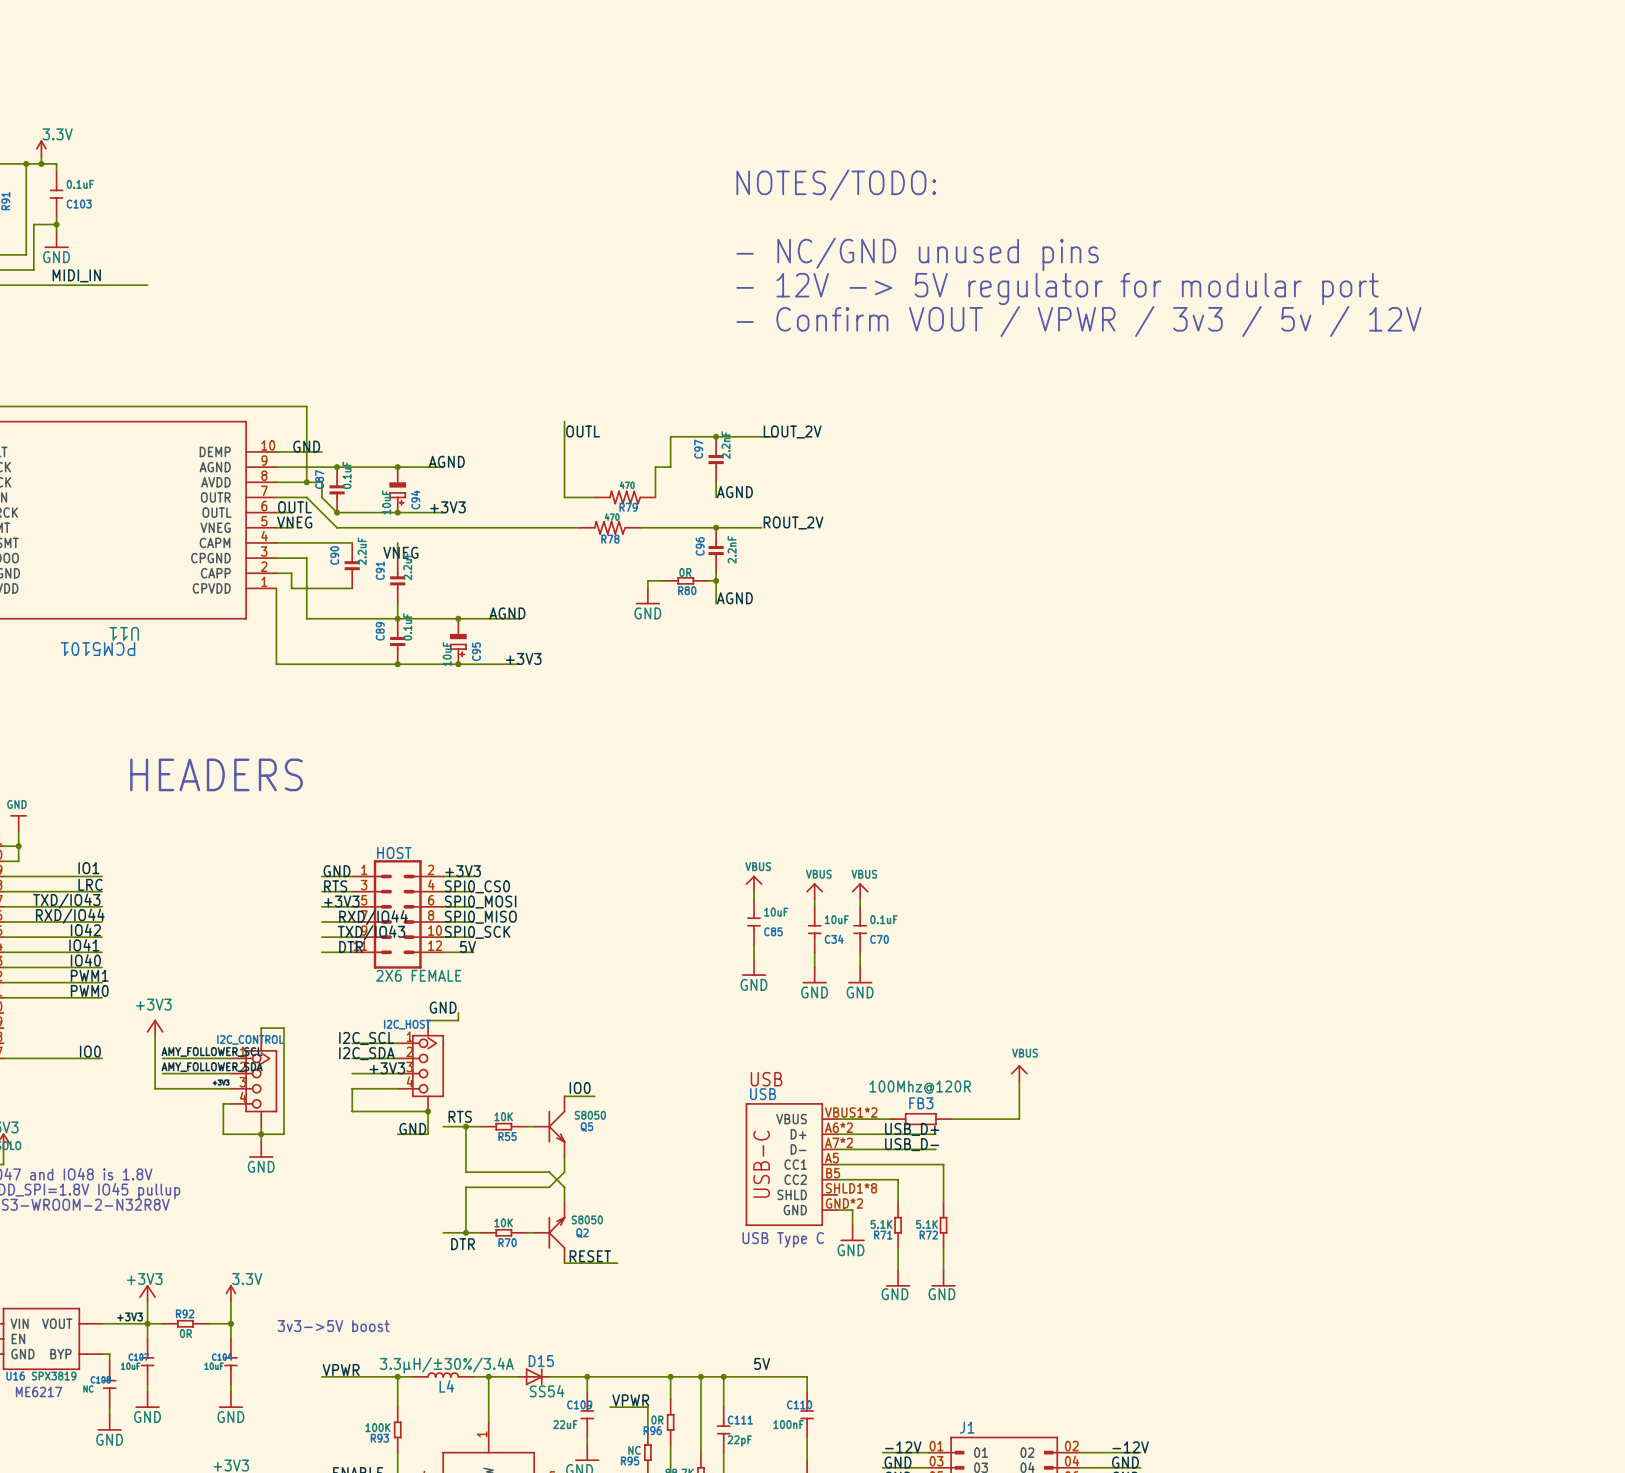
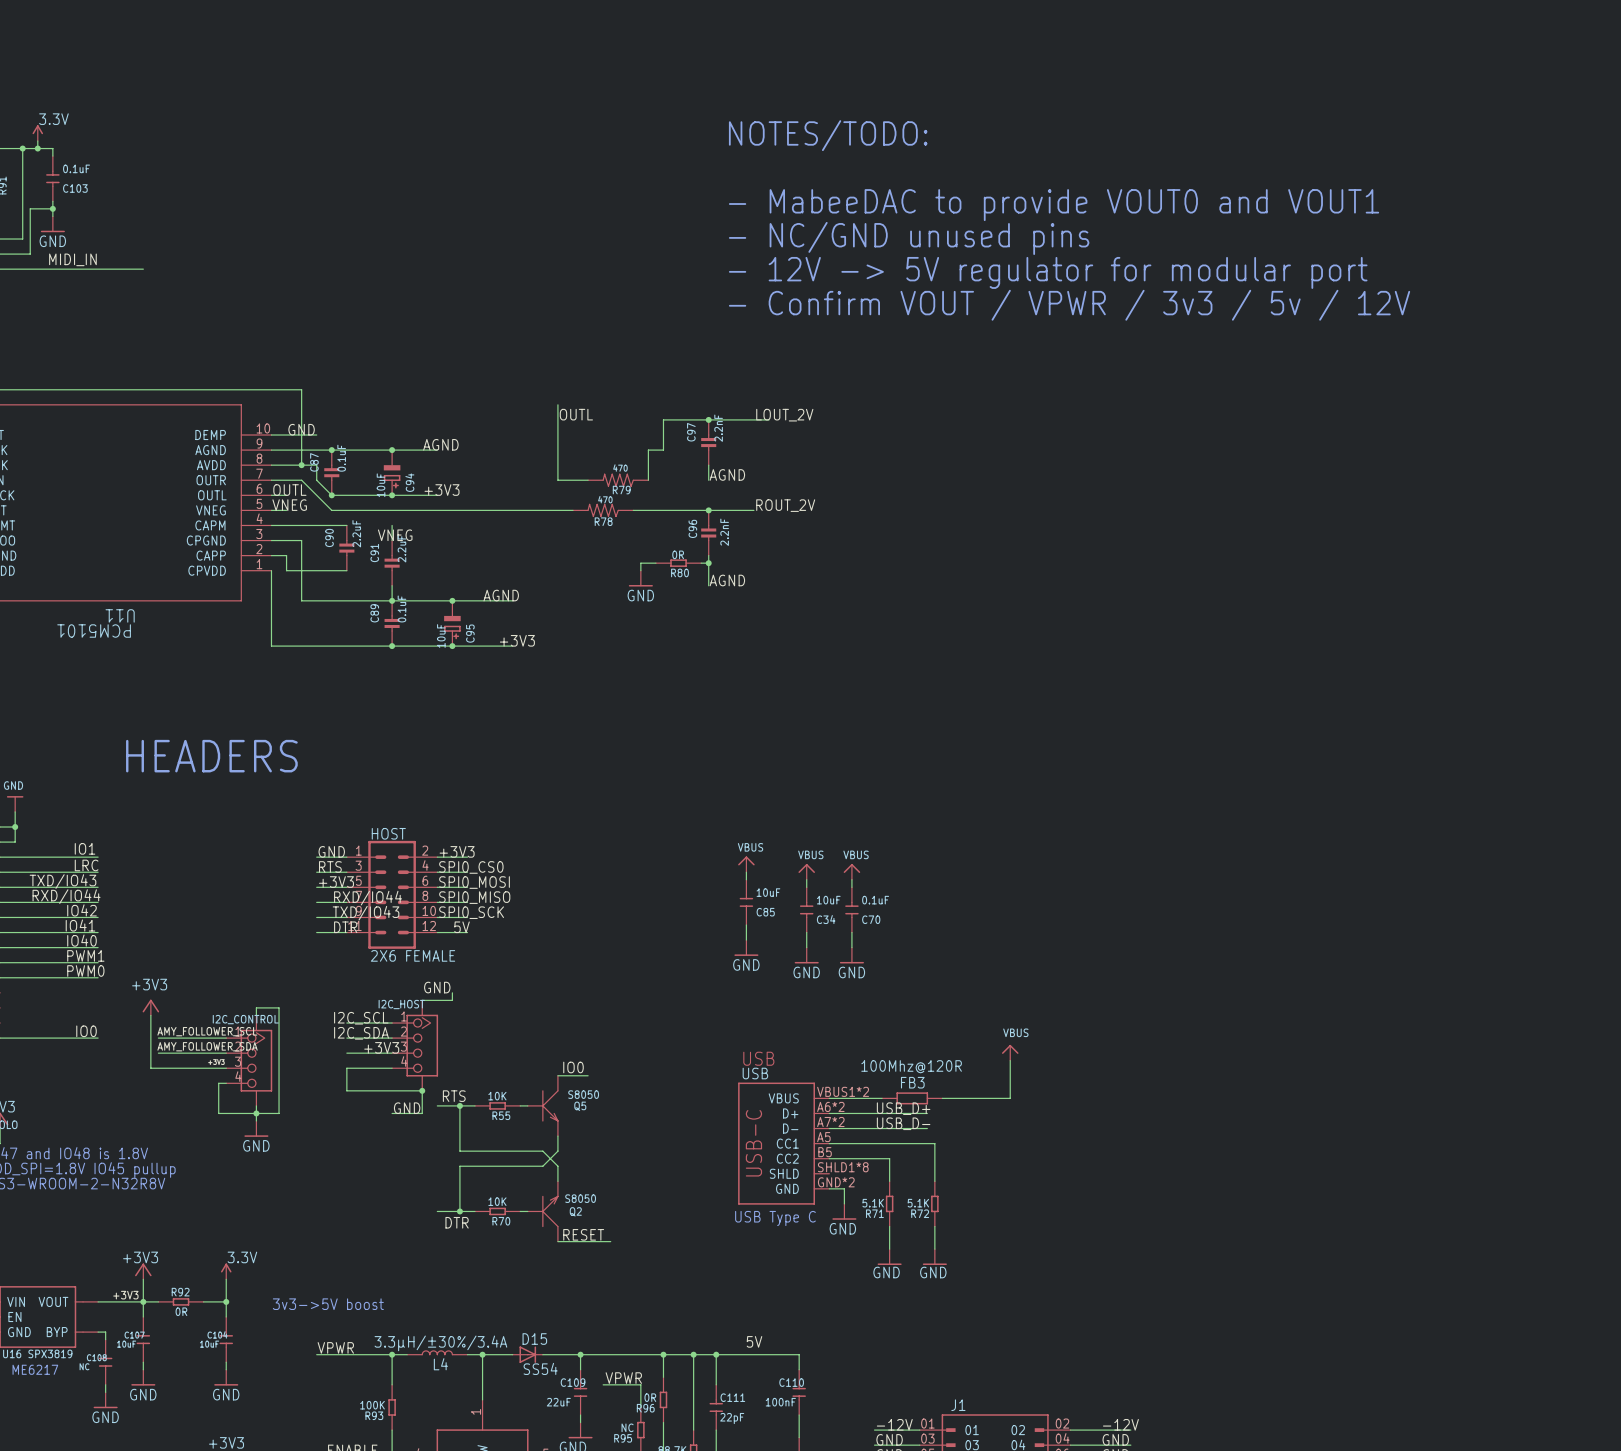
text position: NOTES/TODO: (836, 185) -> NOTES/TODO: (828, 135)
text: none -> - MabeeDAC to provide VOUT0 and VOUT1 (1054, 205)

